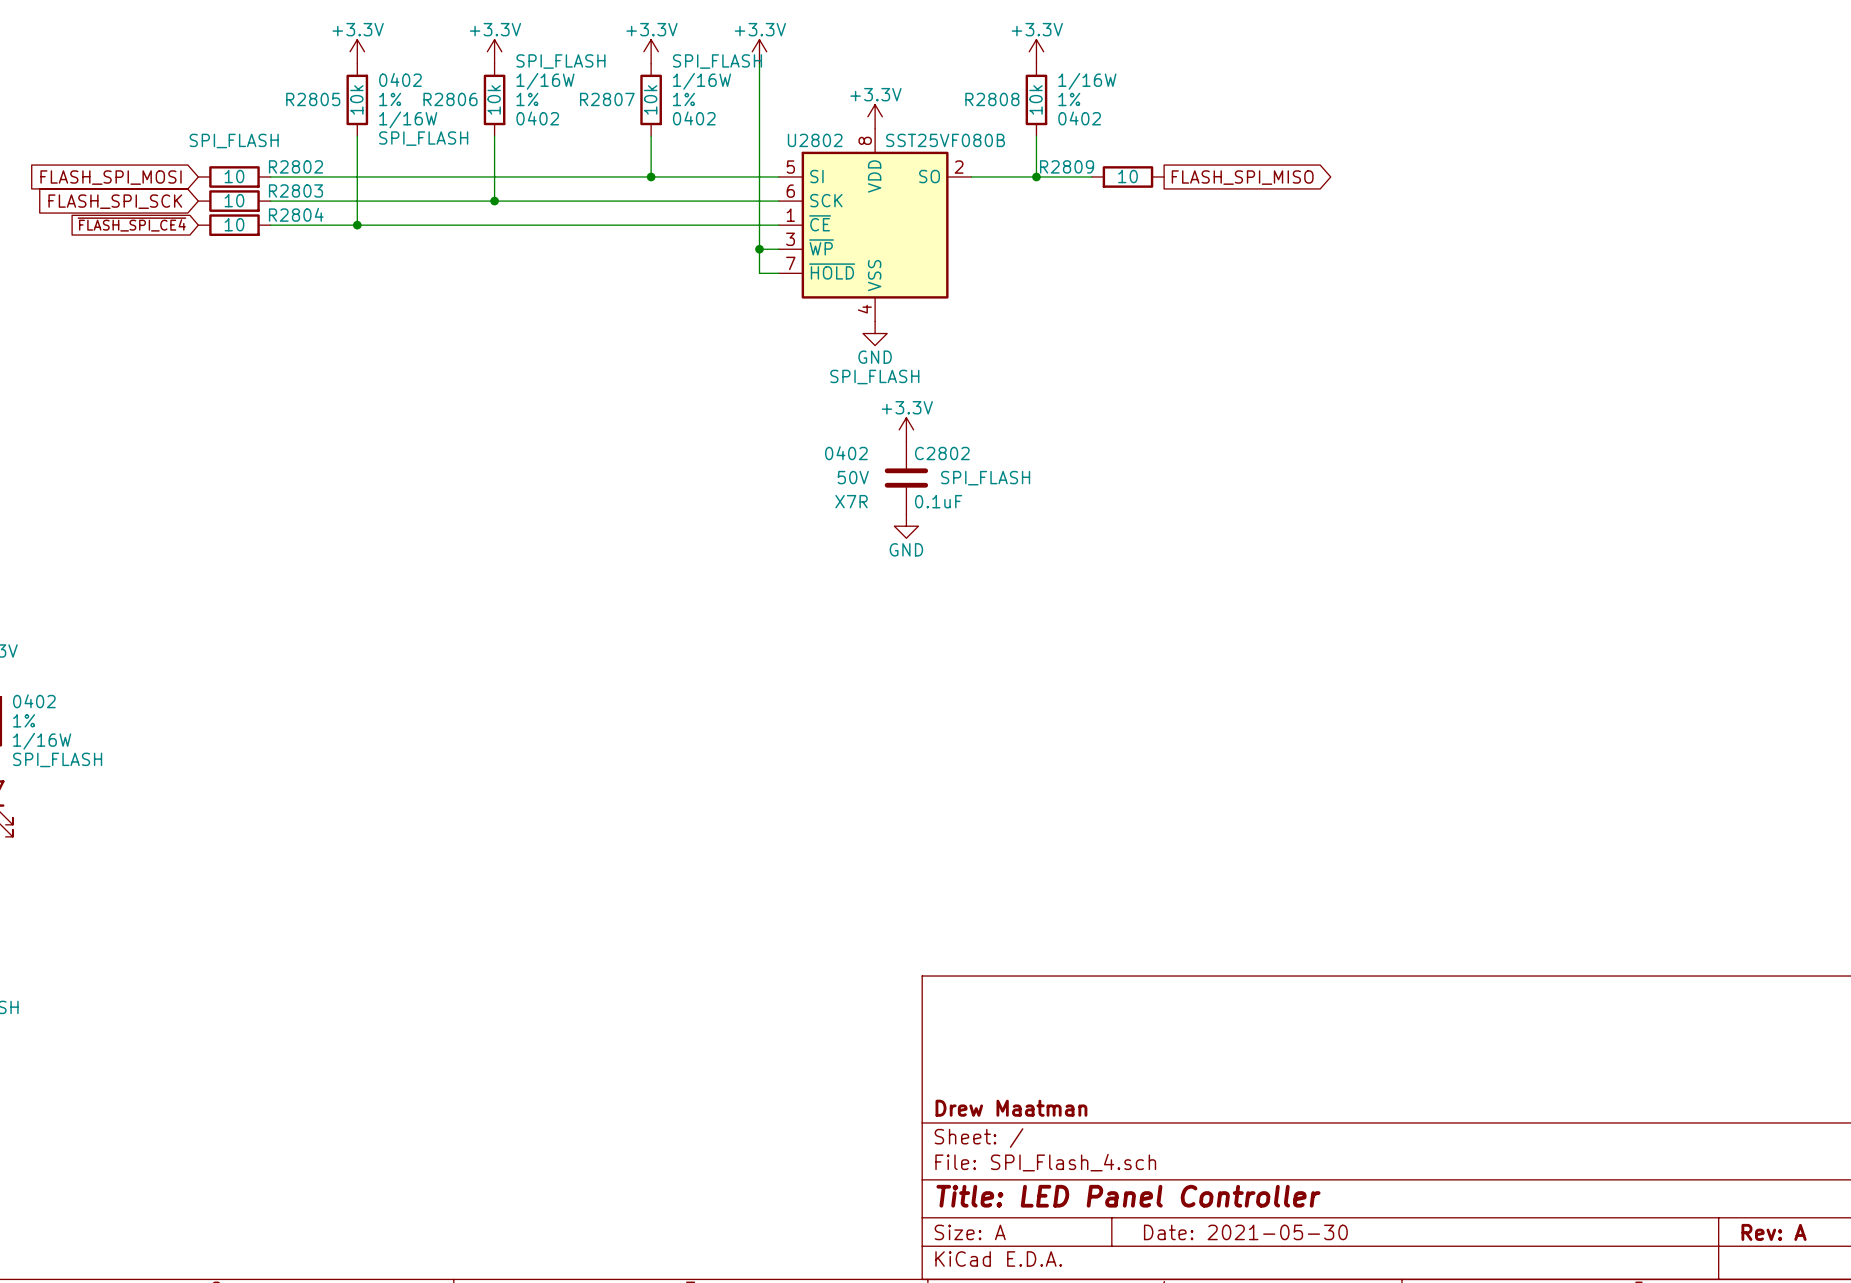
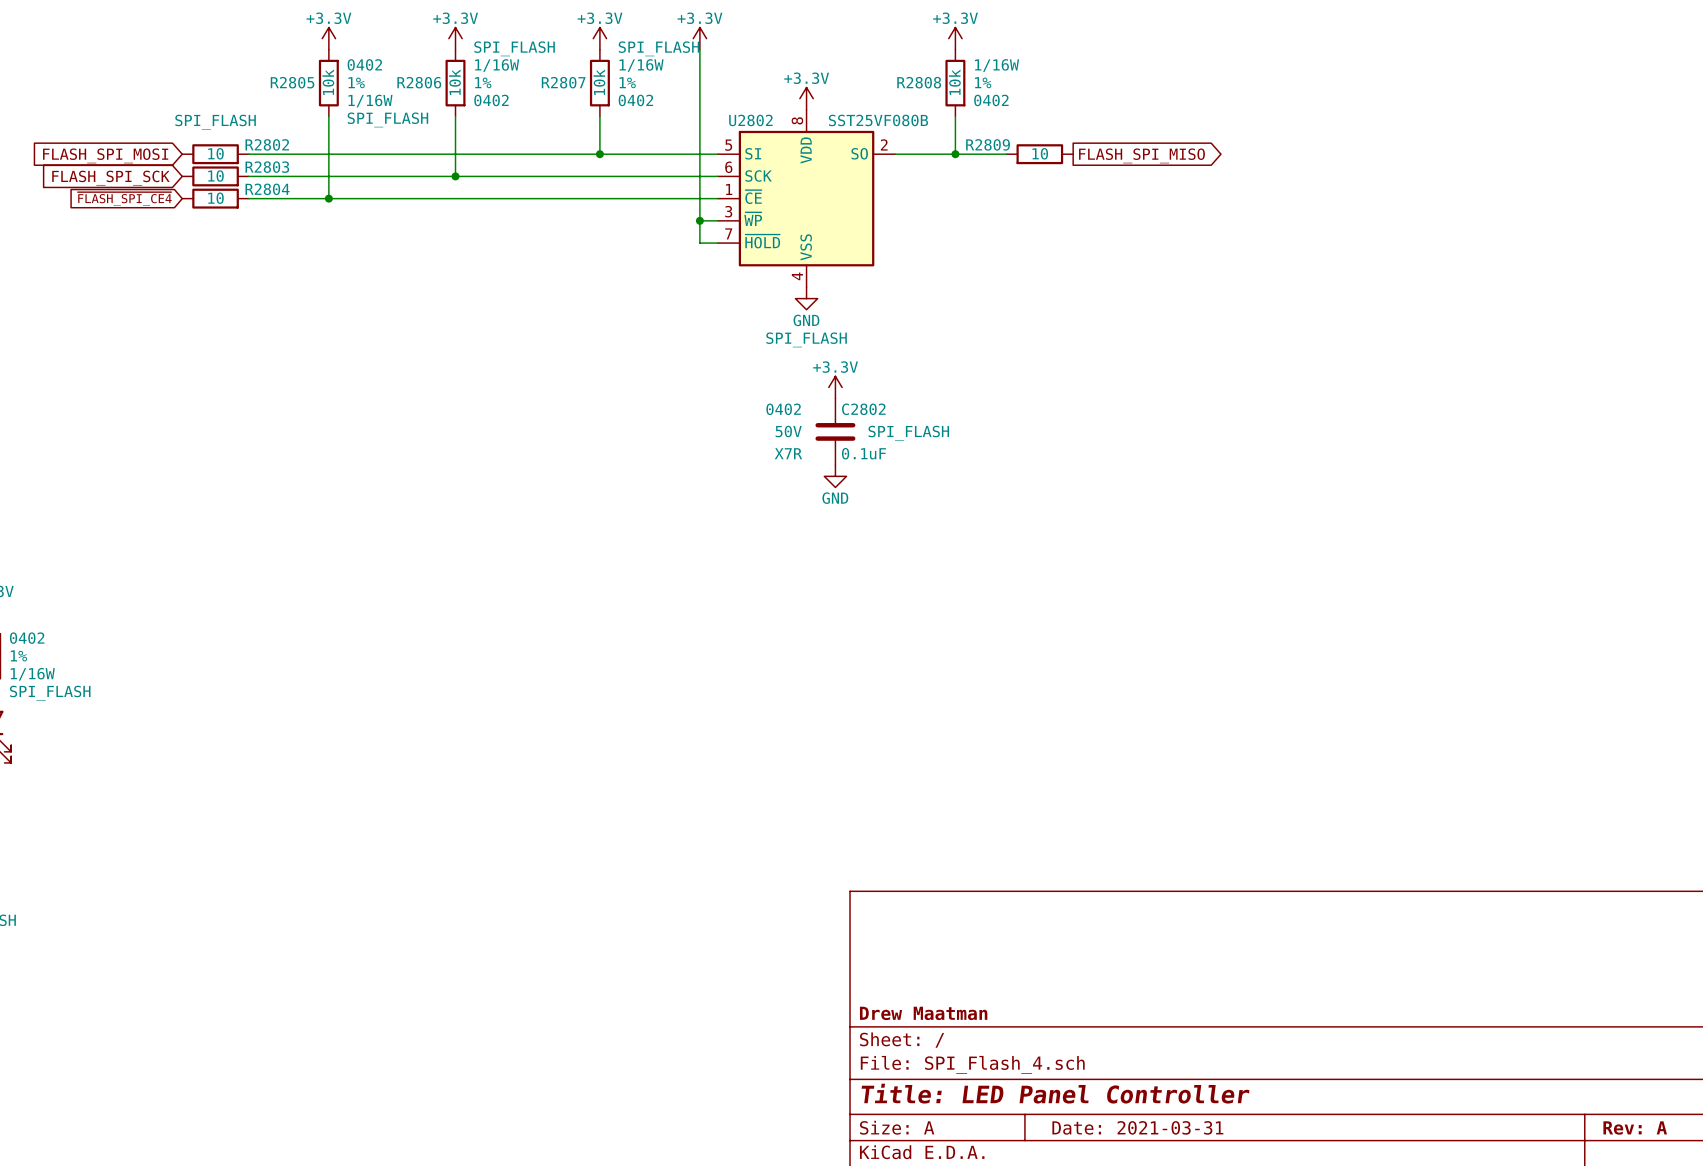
title block: Date: 2021-05-30 (1245, 1232) -> Date: 2021-03-31 (1137, 1127)

